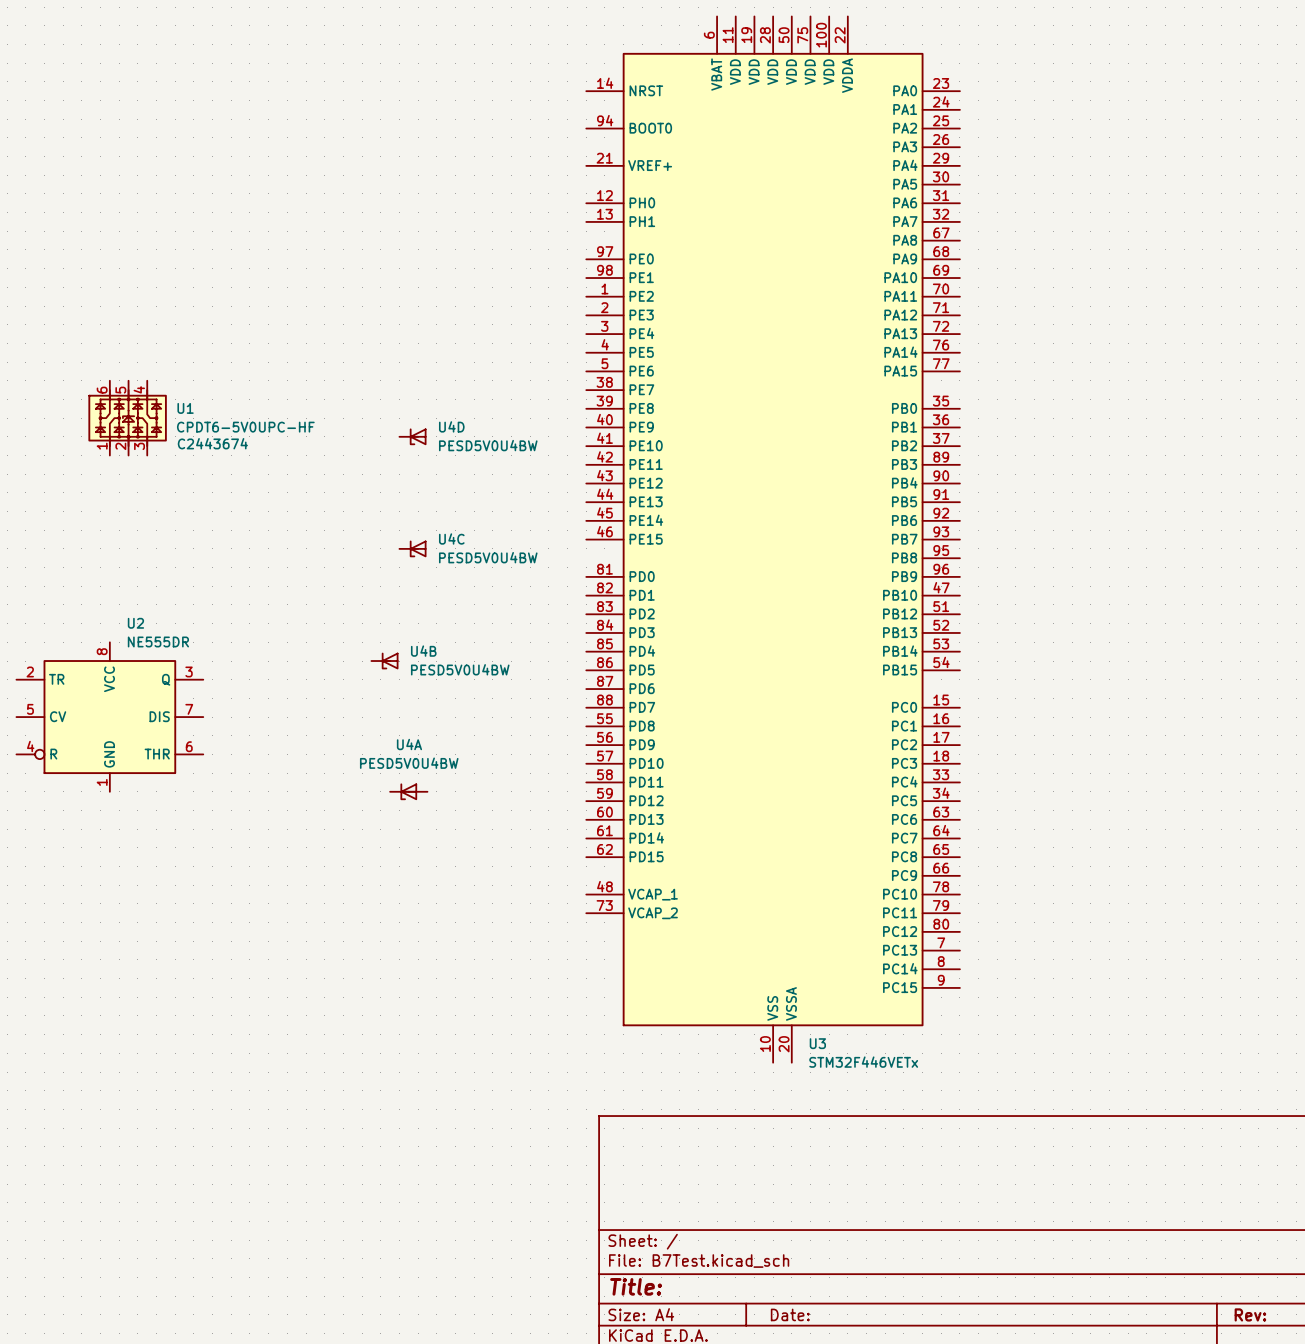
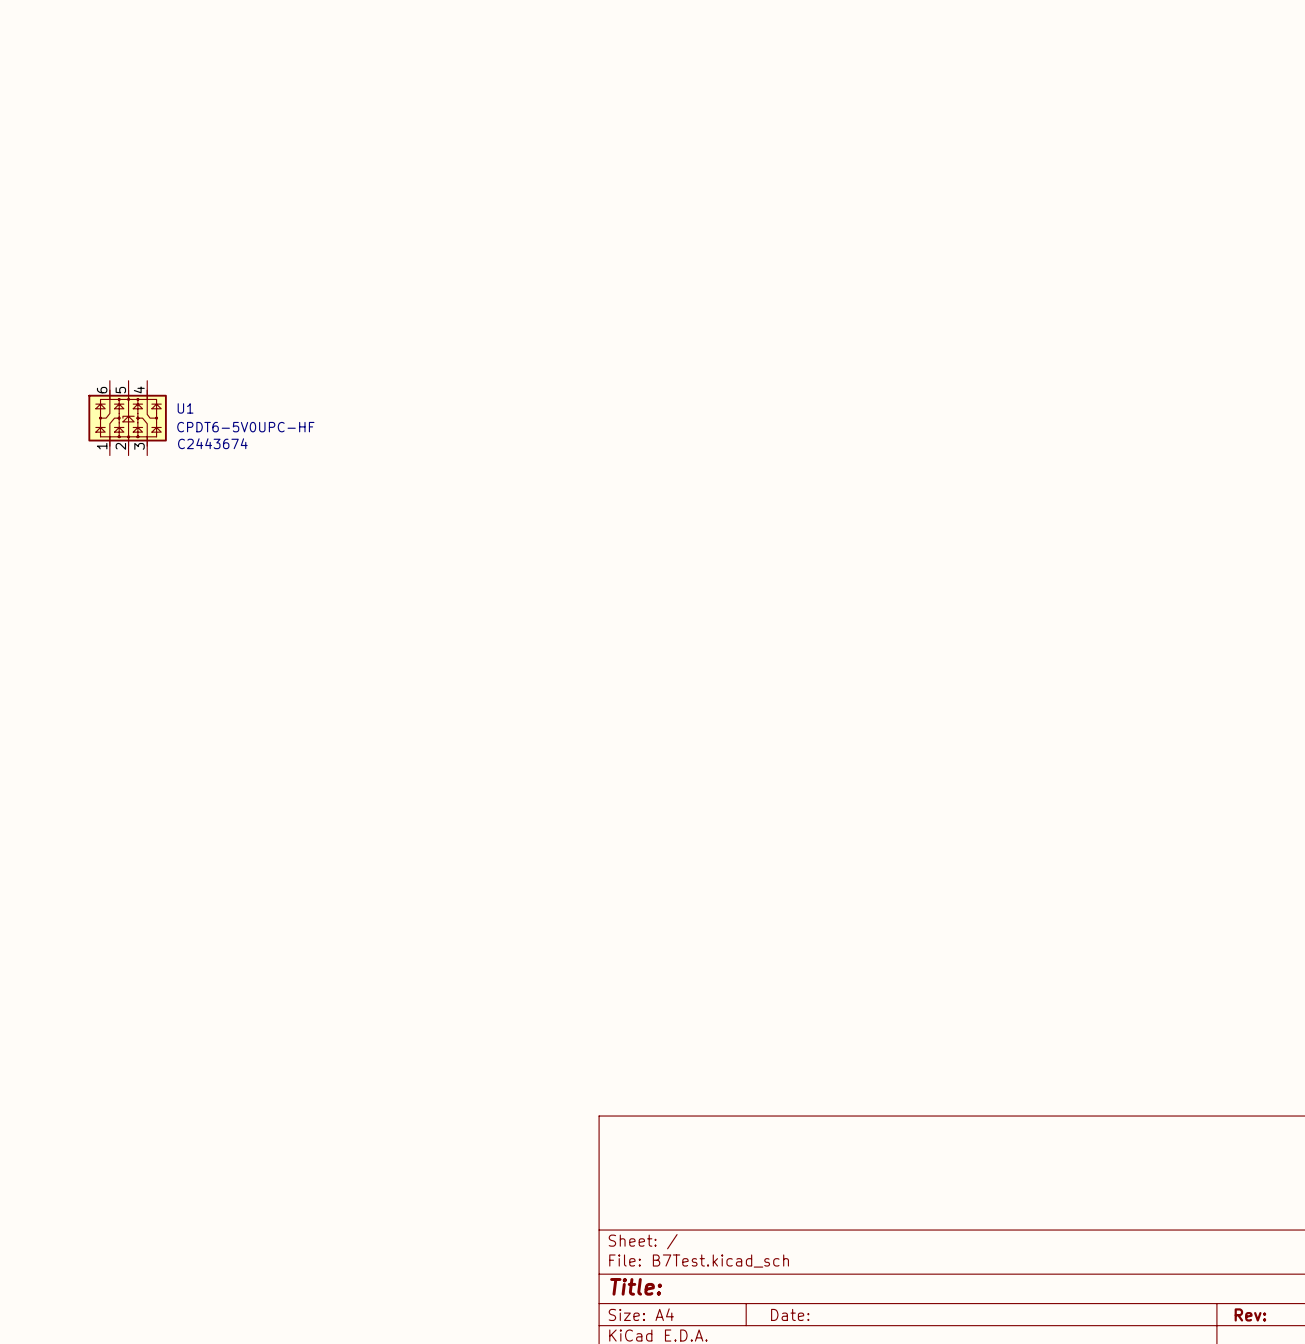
U4D: PESD5V0U4BW (412, 436) -> none
U3: STM32F446VETx (773, 539) -> none
U4C: PESD5V0U4BW (412, 548) -> none
U4B: PESD5V0U4BW (384, 661) -> none
U2: NE555DR (109, 717) -> none
U4A: PESD5V0U4BW (408, 791) -> none

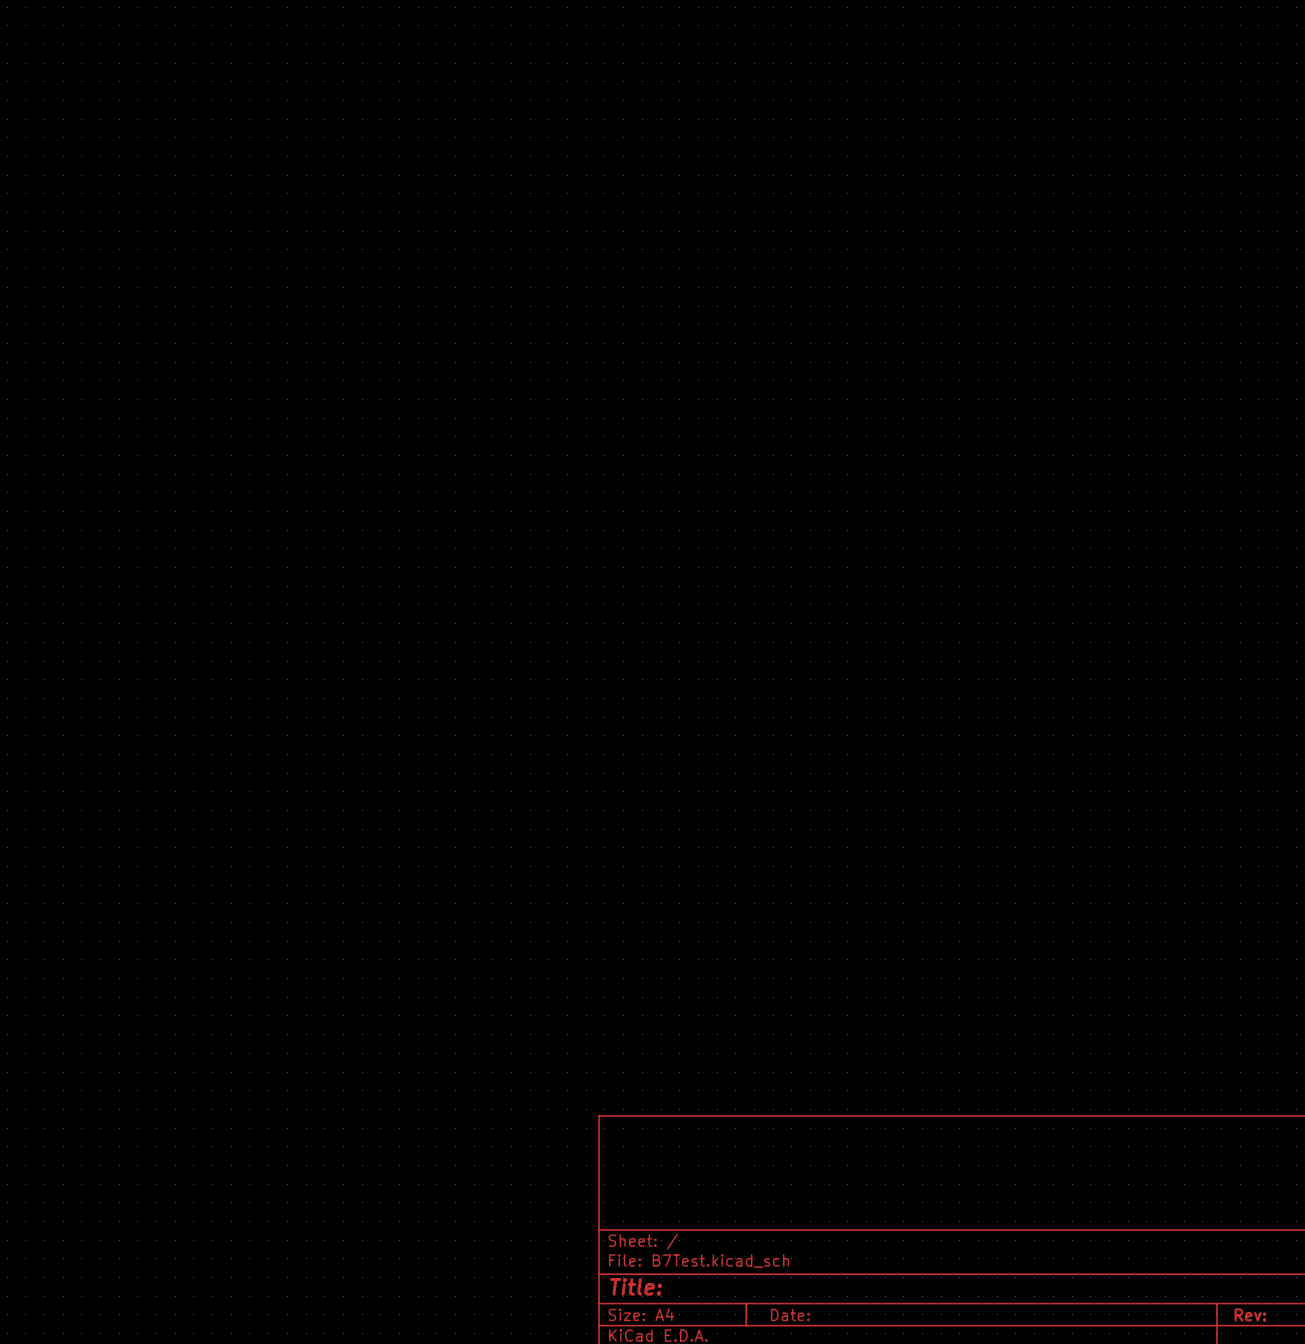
U1: CPDT6-5V0UPC-HF (127, 418) -> none

